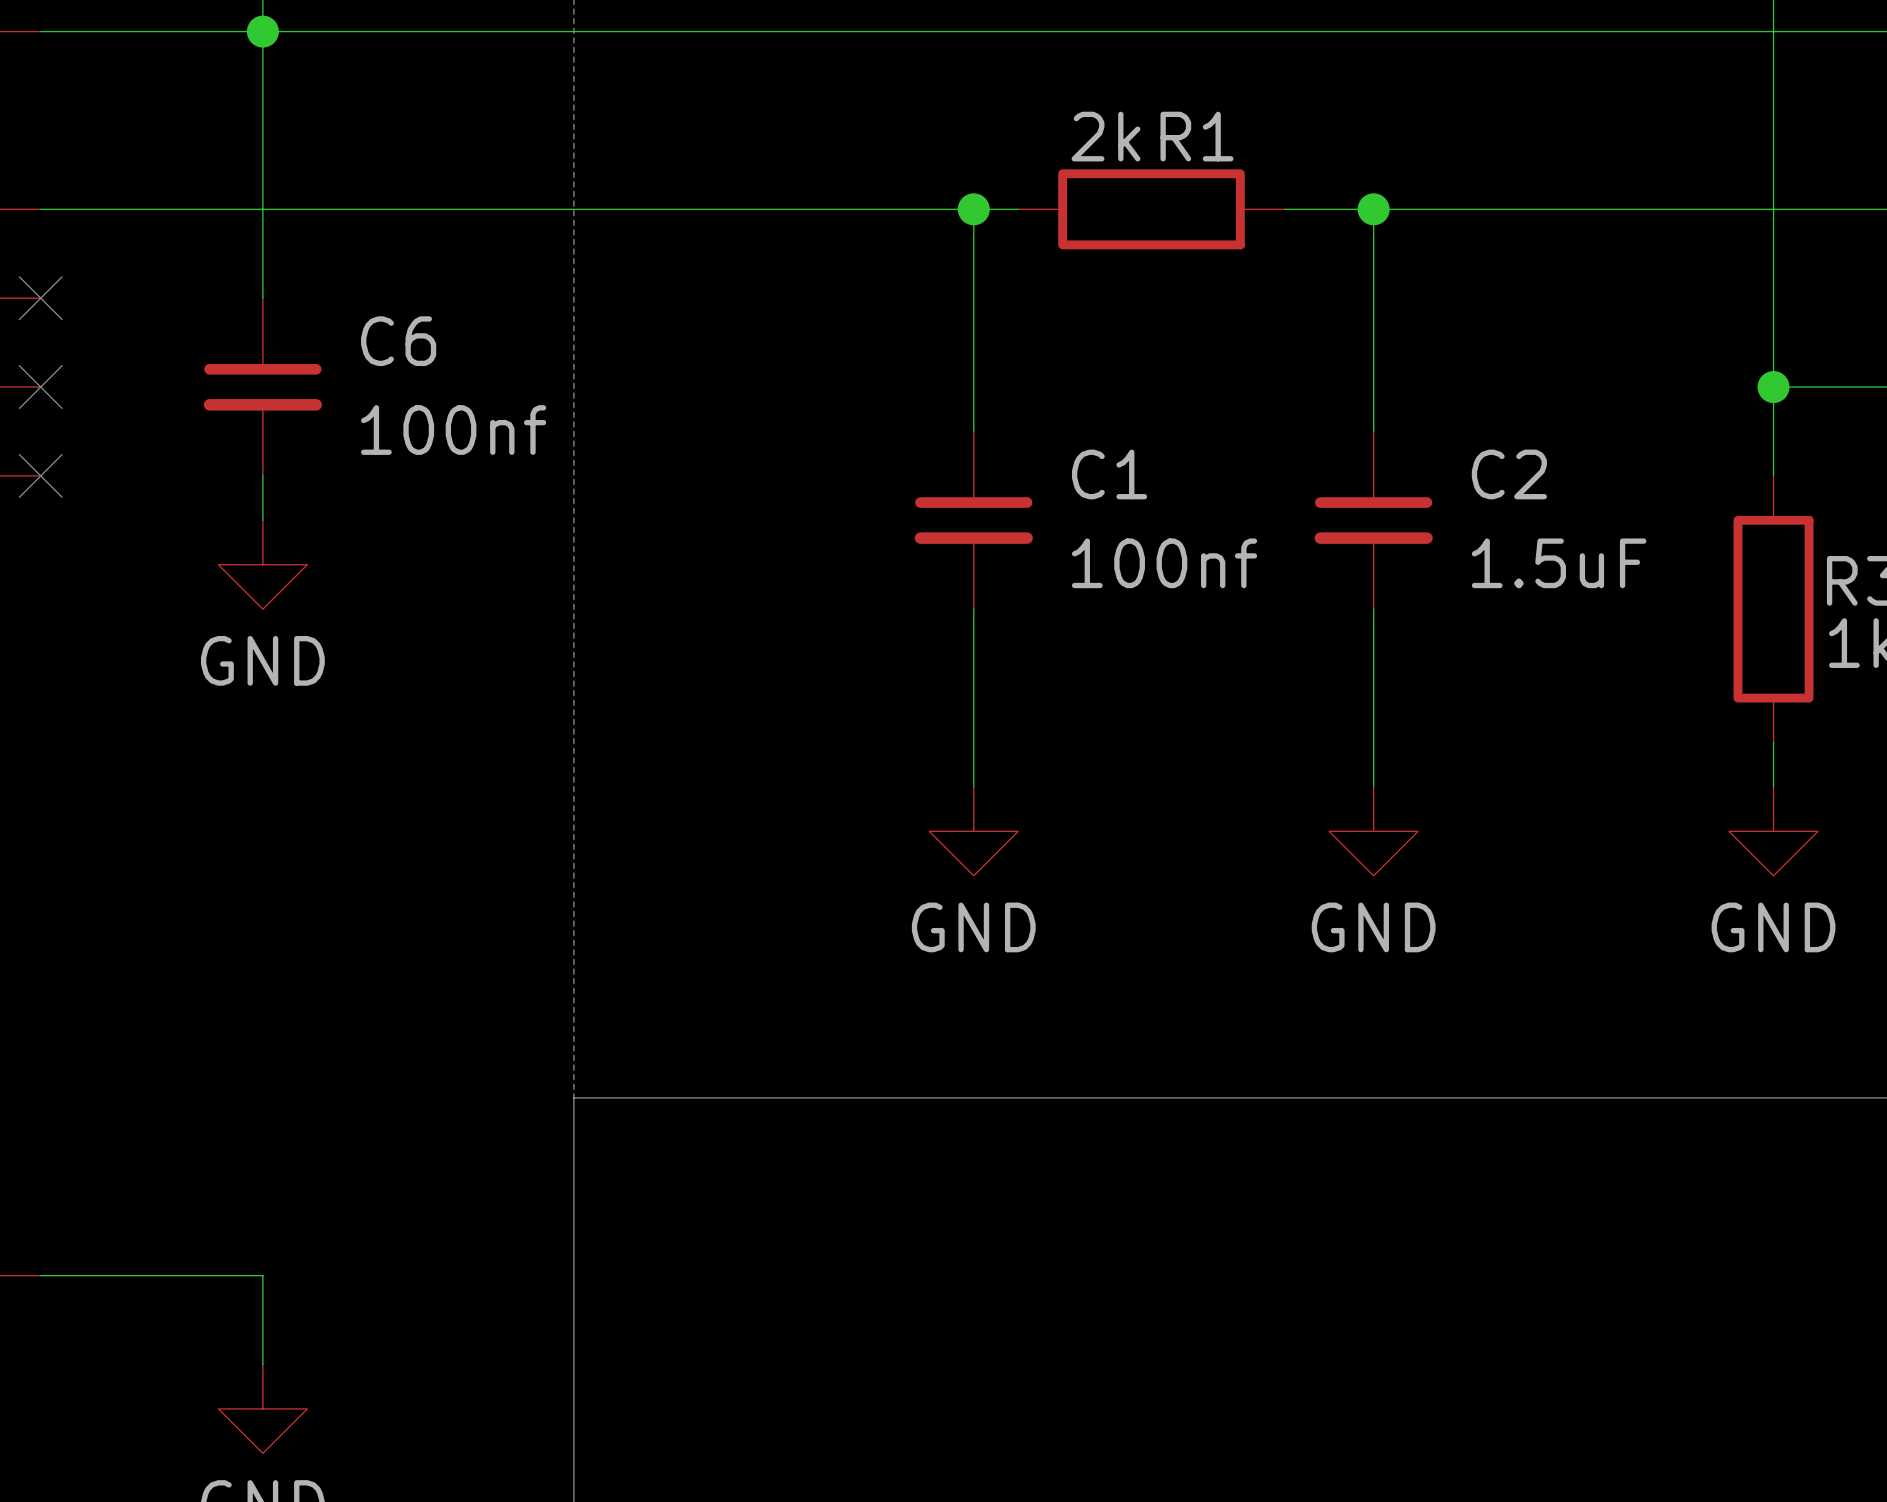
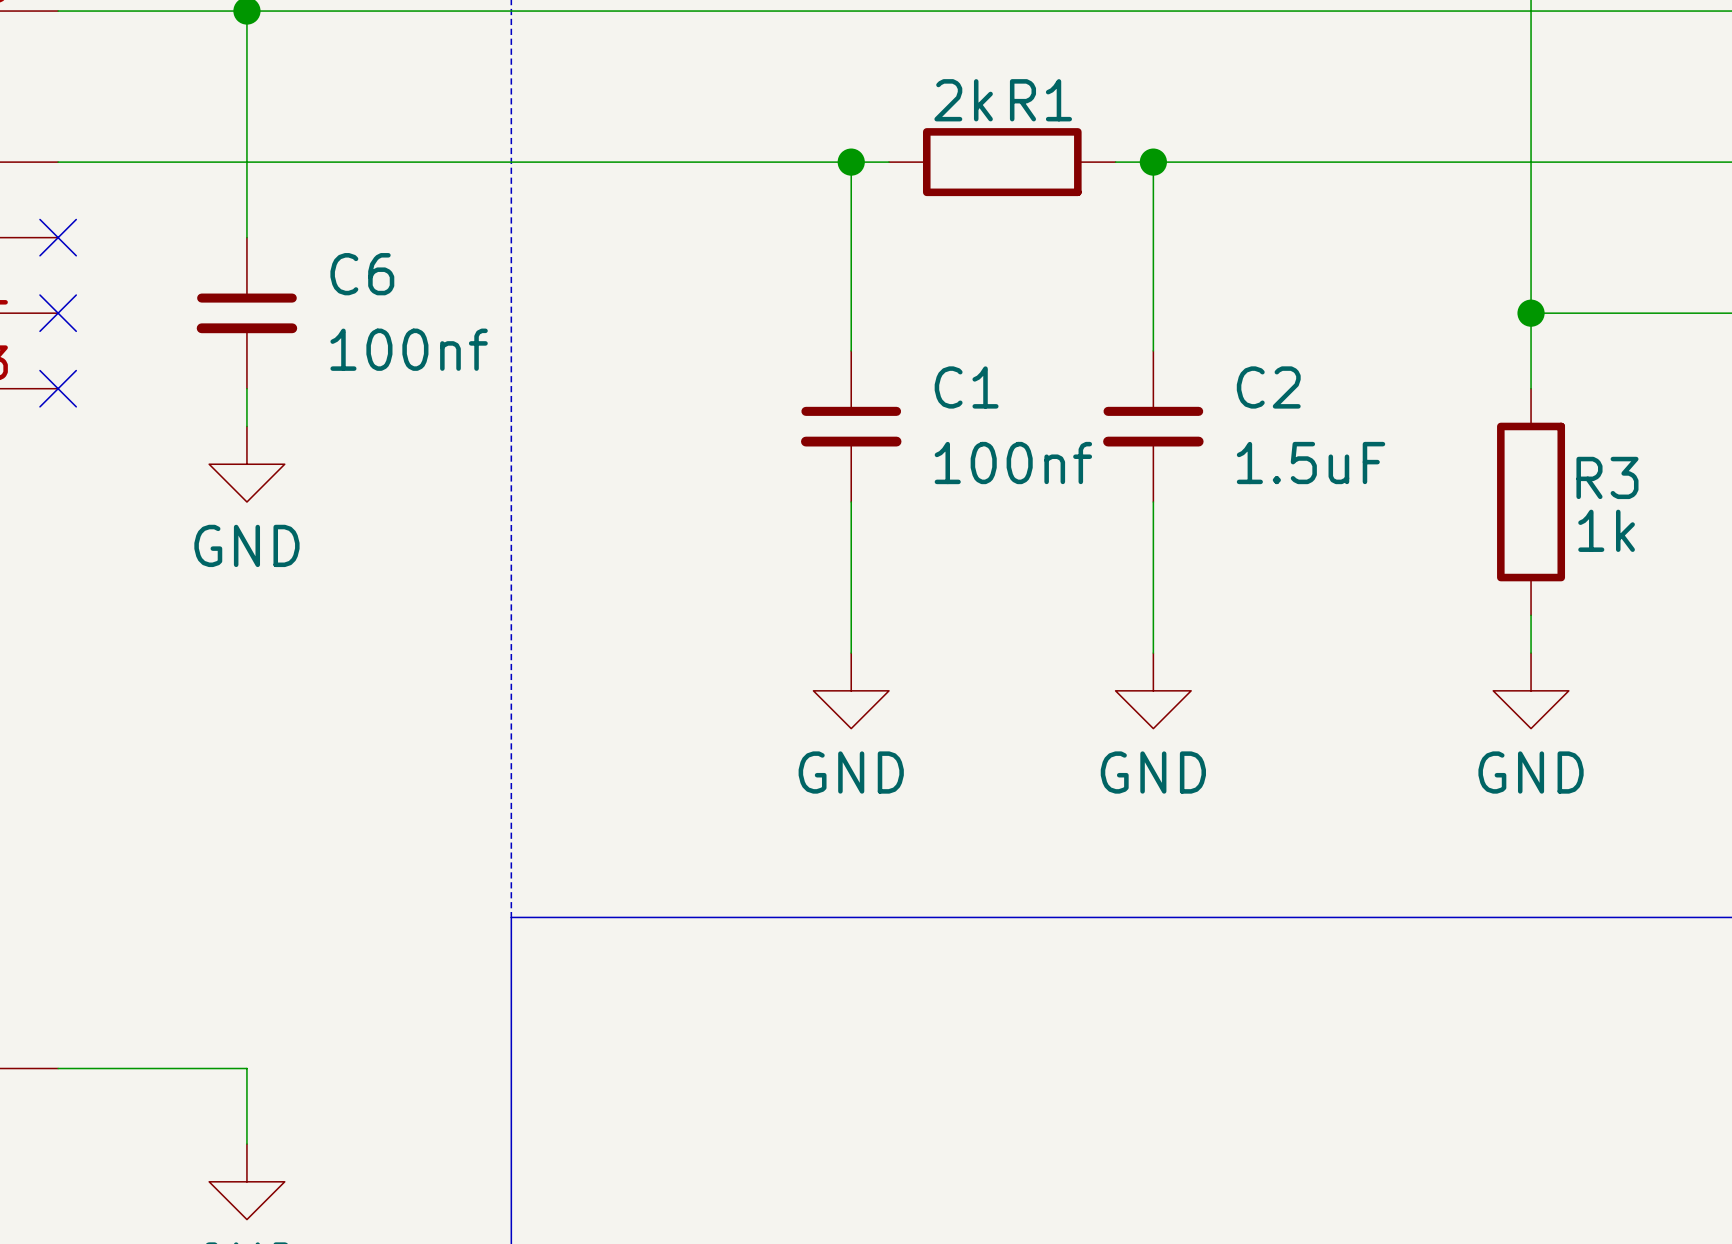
wire: (1373, 209) (1373, 431) -> (1153, 162) (1153, 350)
junction position: (1373, 209) -> (1153, 162)
C2 position: (1373, 520) -> (1153, 426)
wire: (1373, 609) (1373, 786) -> (1153, 502) (1153, 653)
power symbol position: GND (1373, 831) -> GND (1153, 690)

